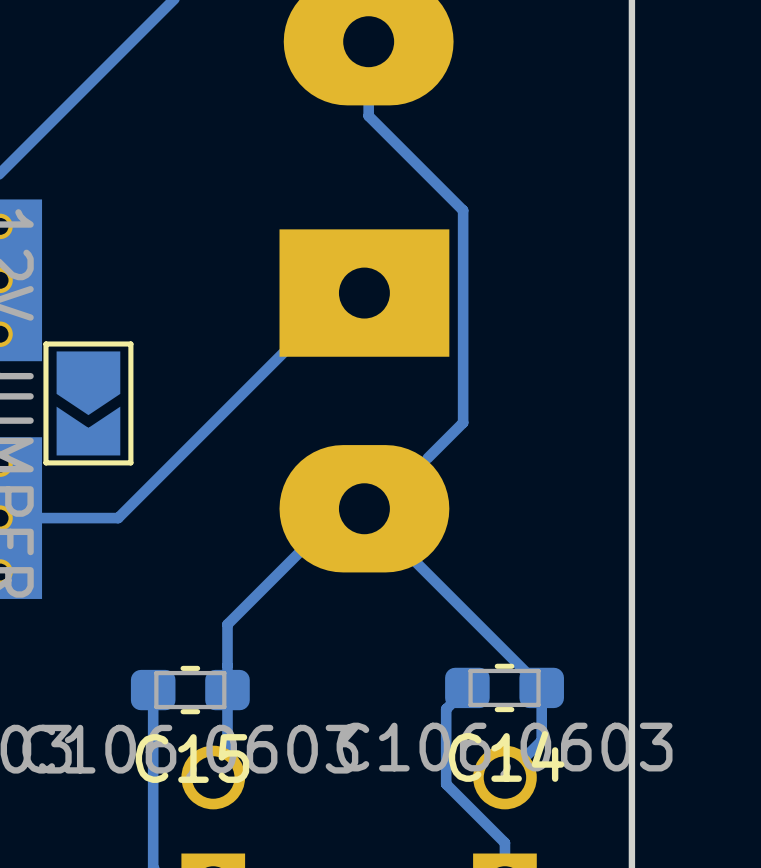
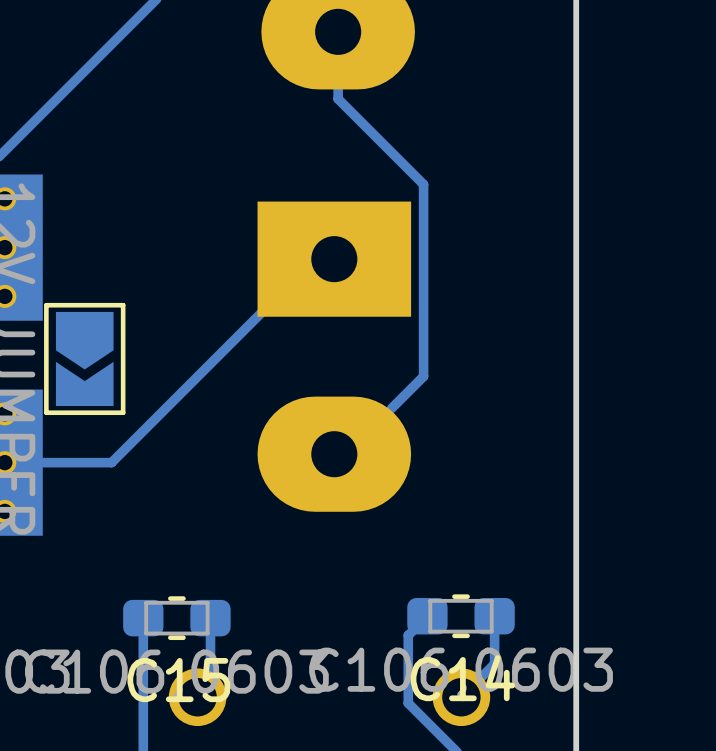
track: (541, 687) (364, 508) (343, 508) (227, 624) (227, 690) -> none

